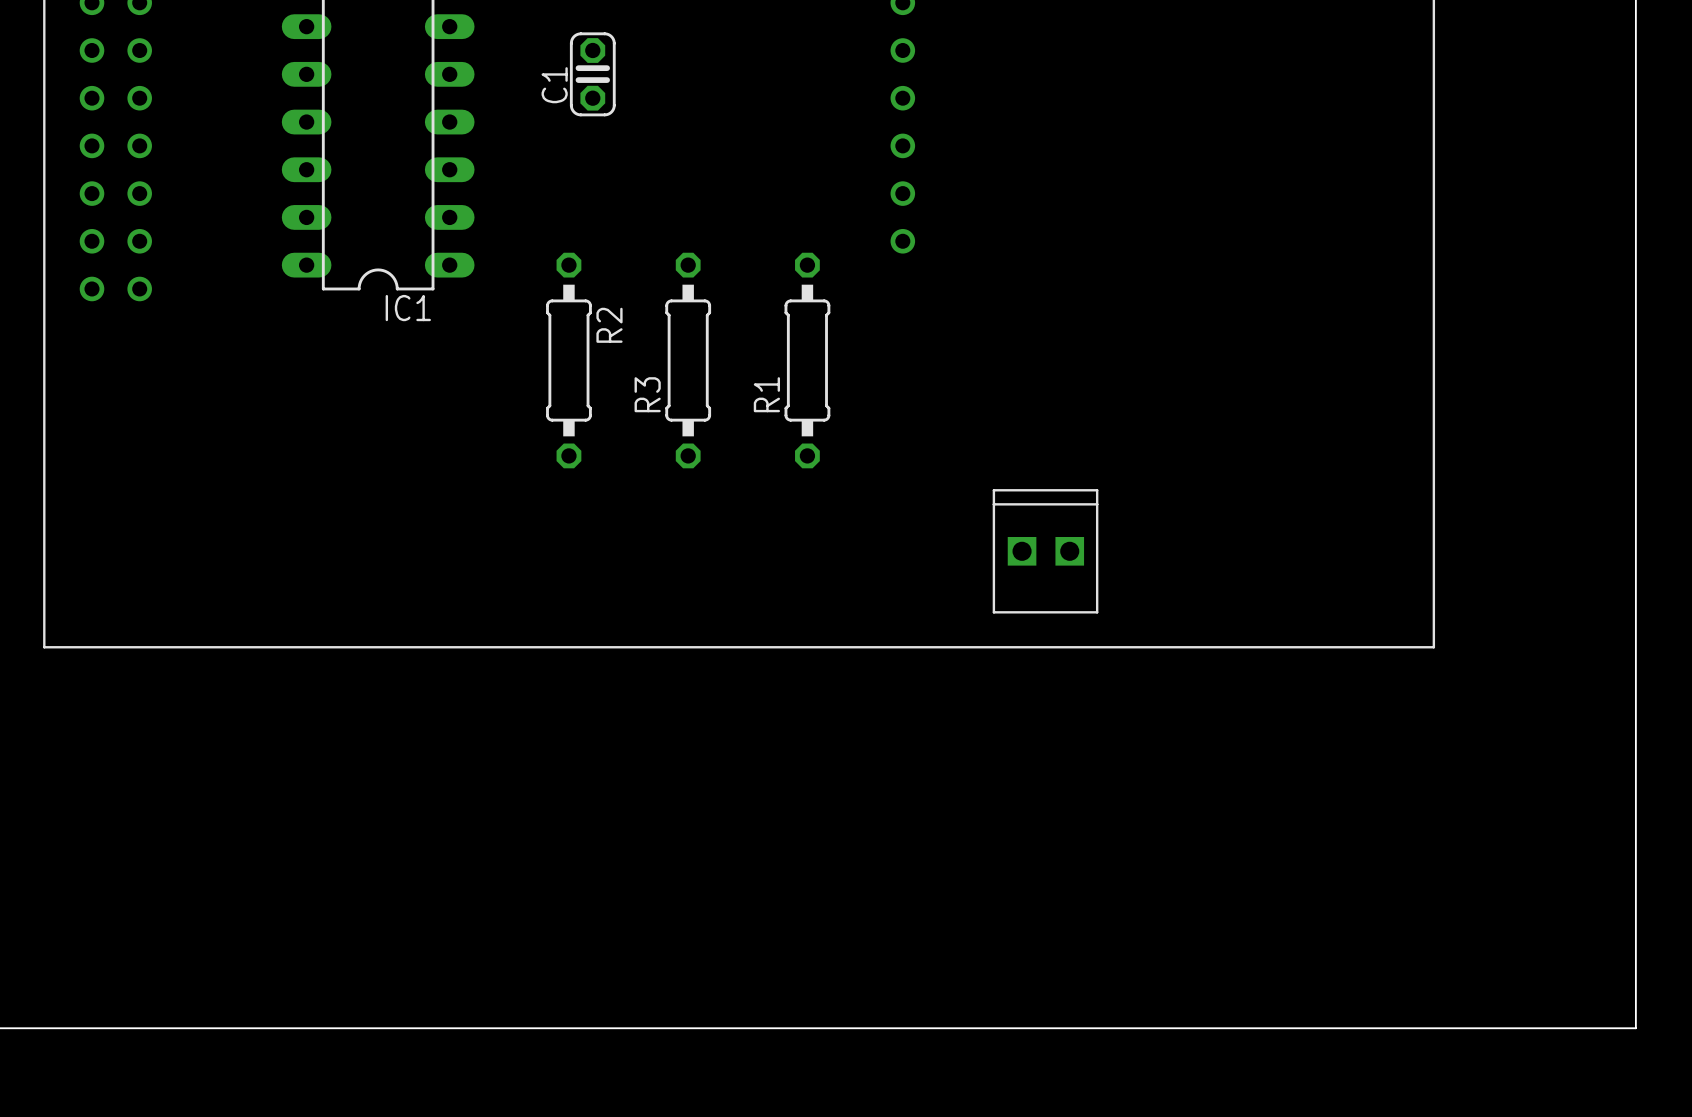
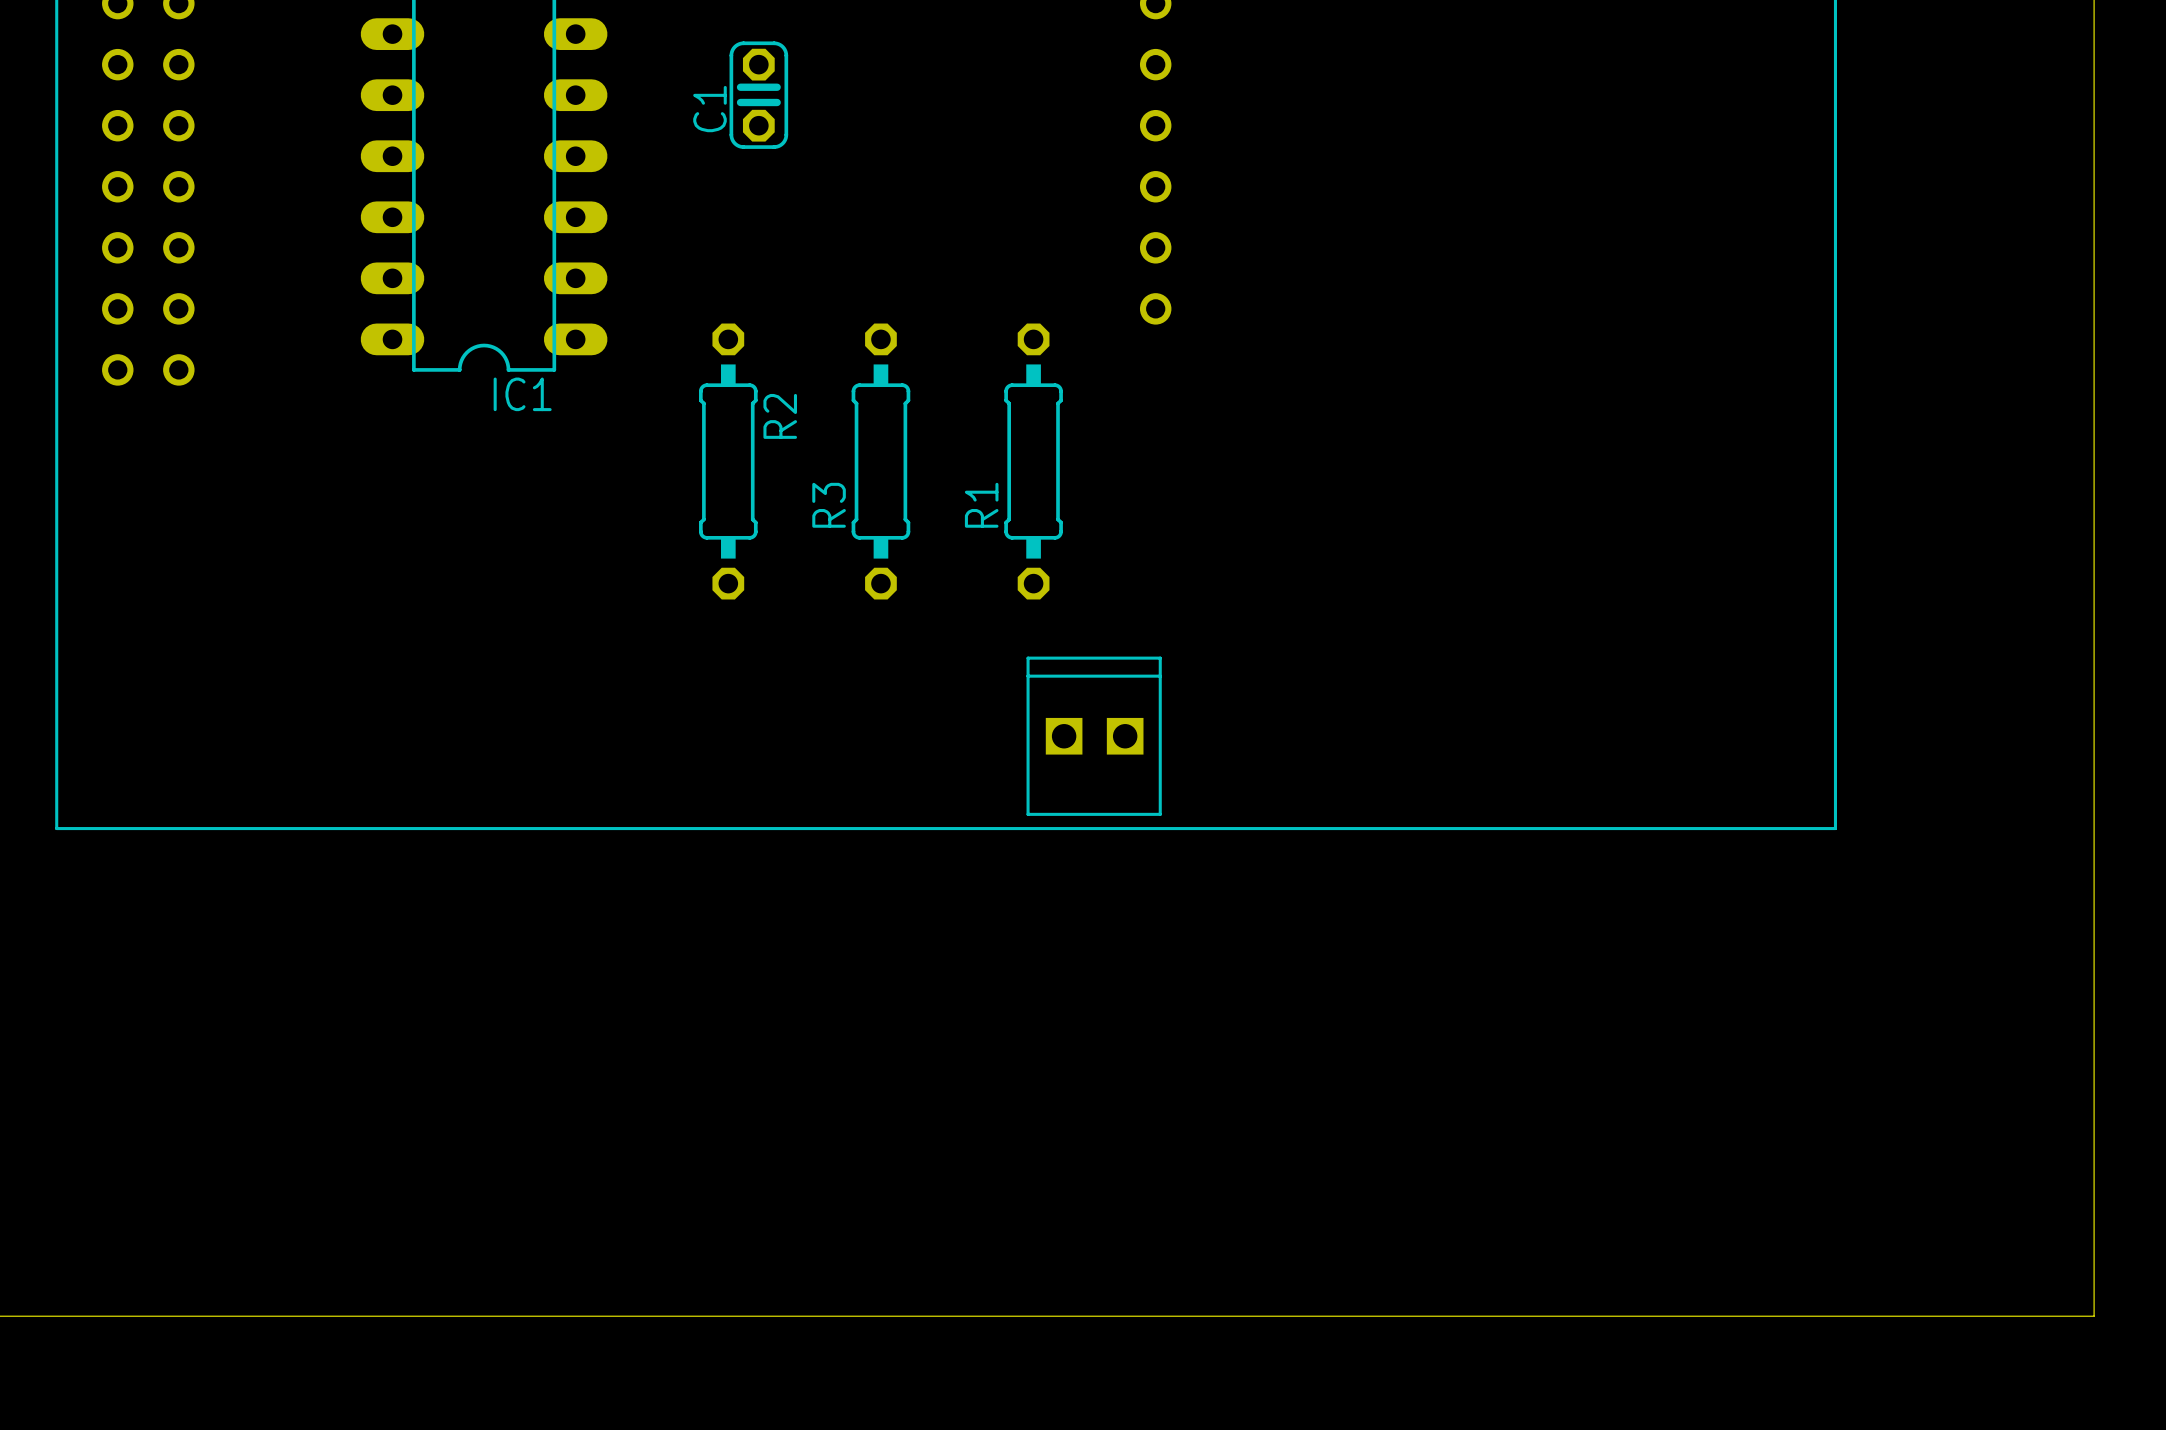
part position: (1045, 551) -> (1094, 736)

